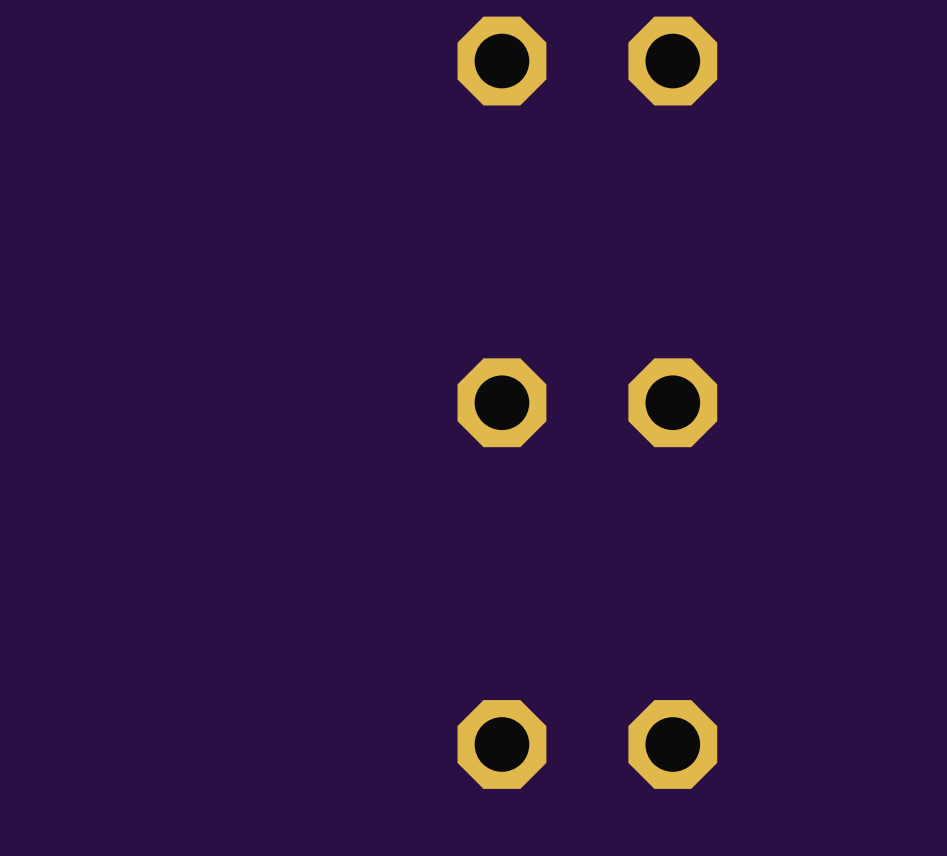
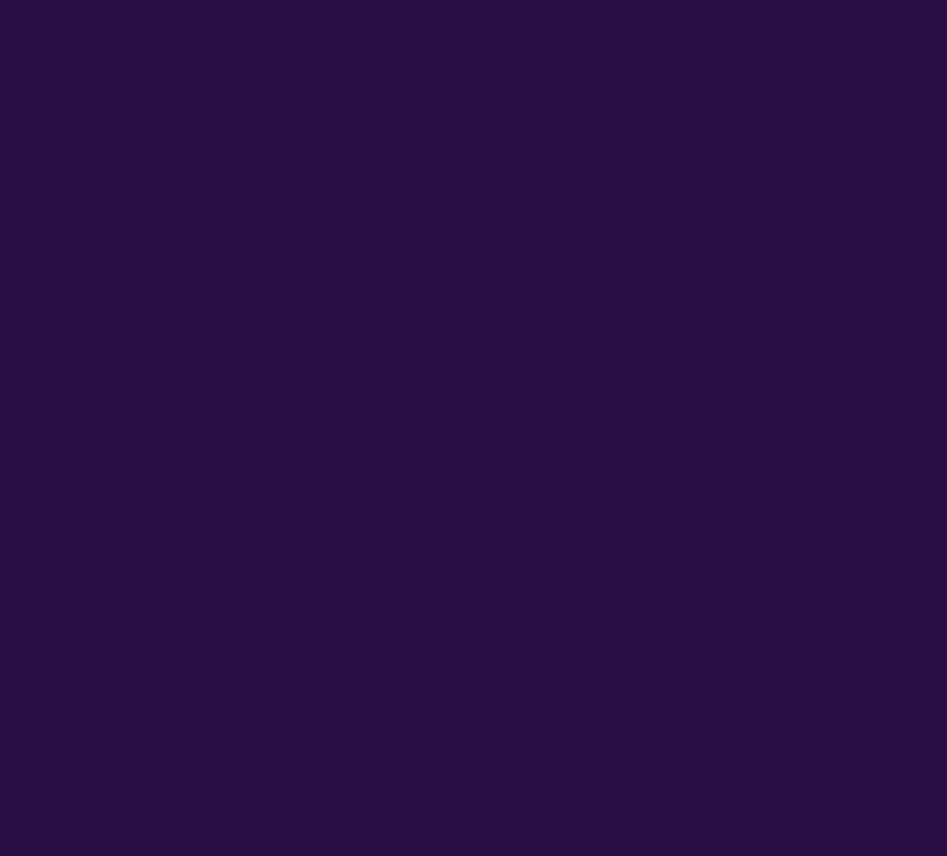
part: (587, 61) -> none
part: (587, 402) -> none
part: (587, 744) -> none

